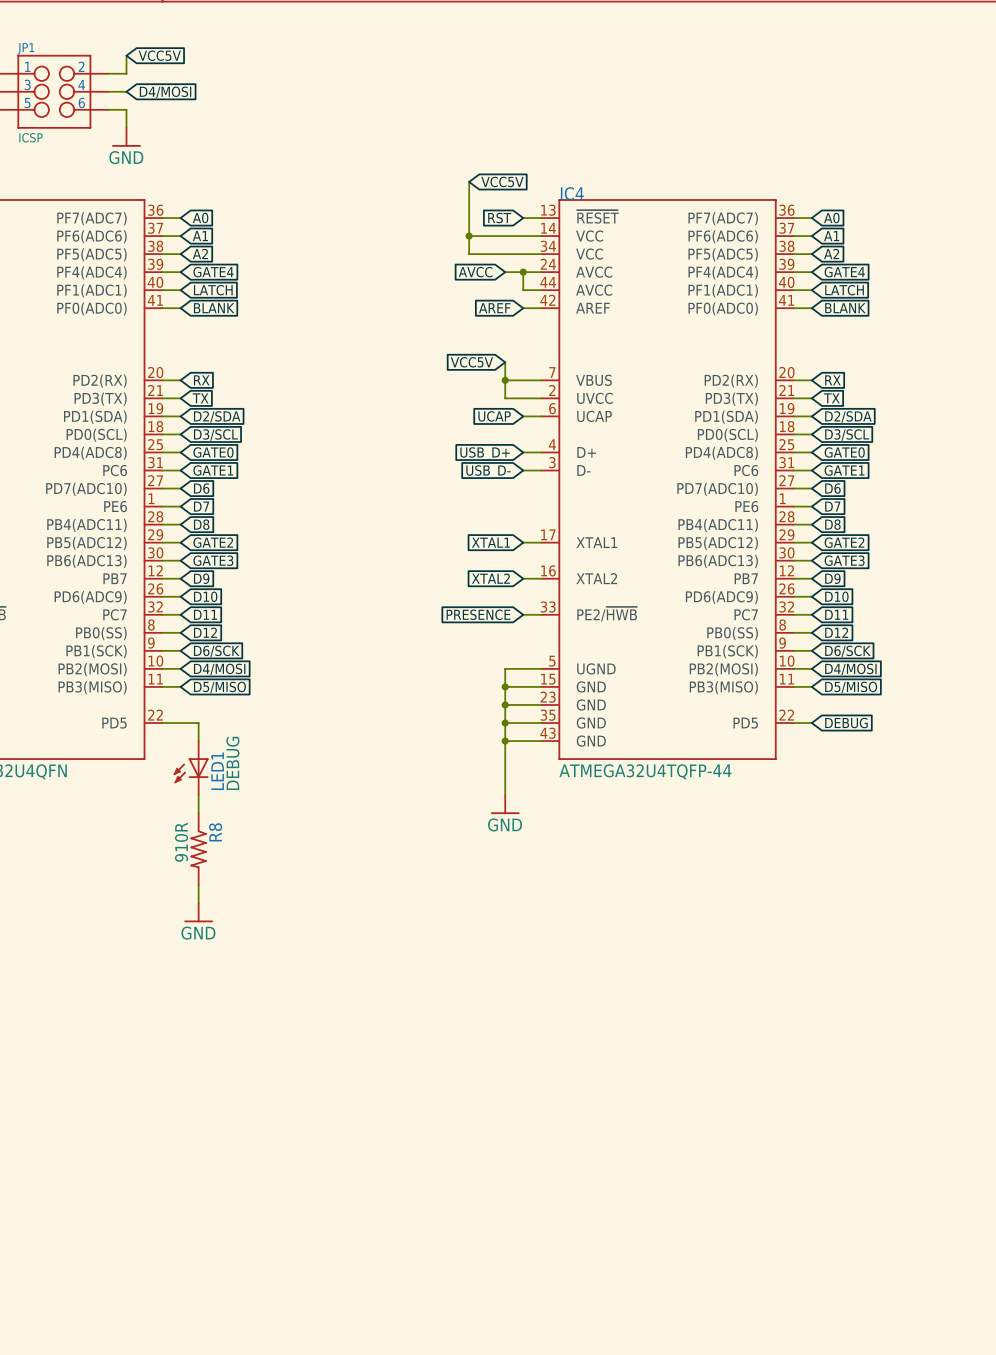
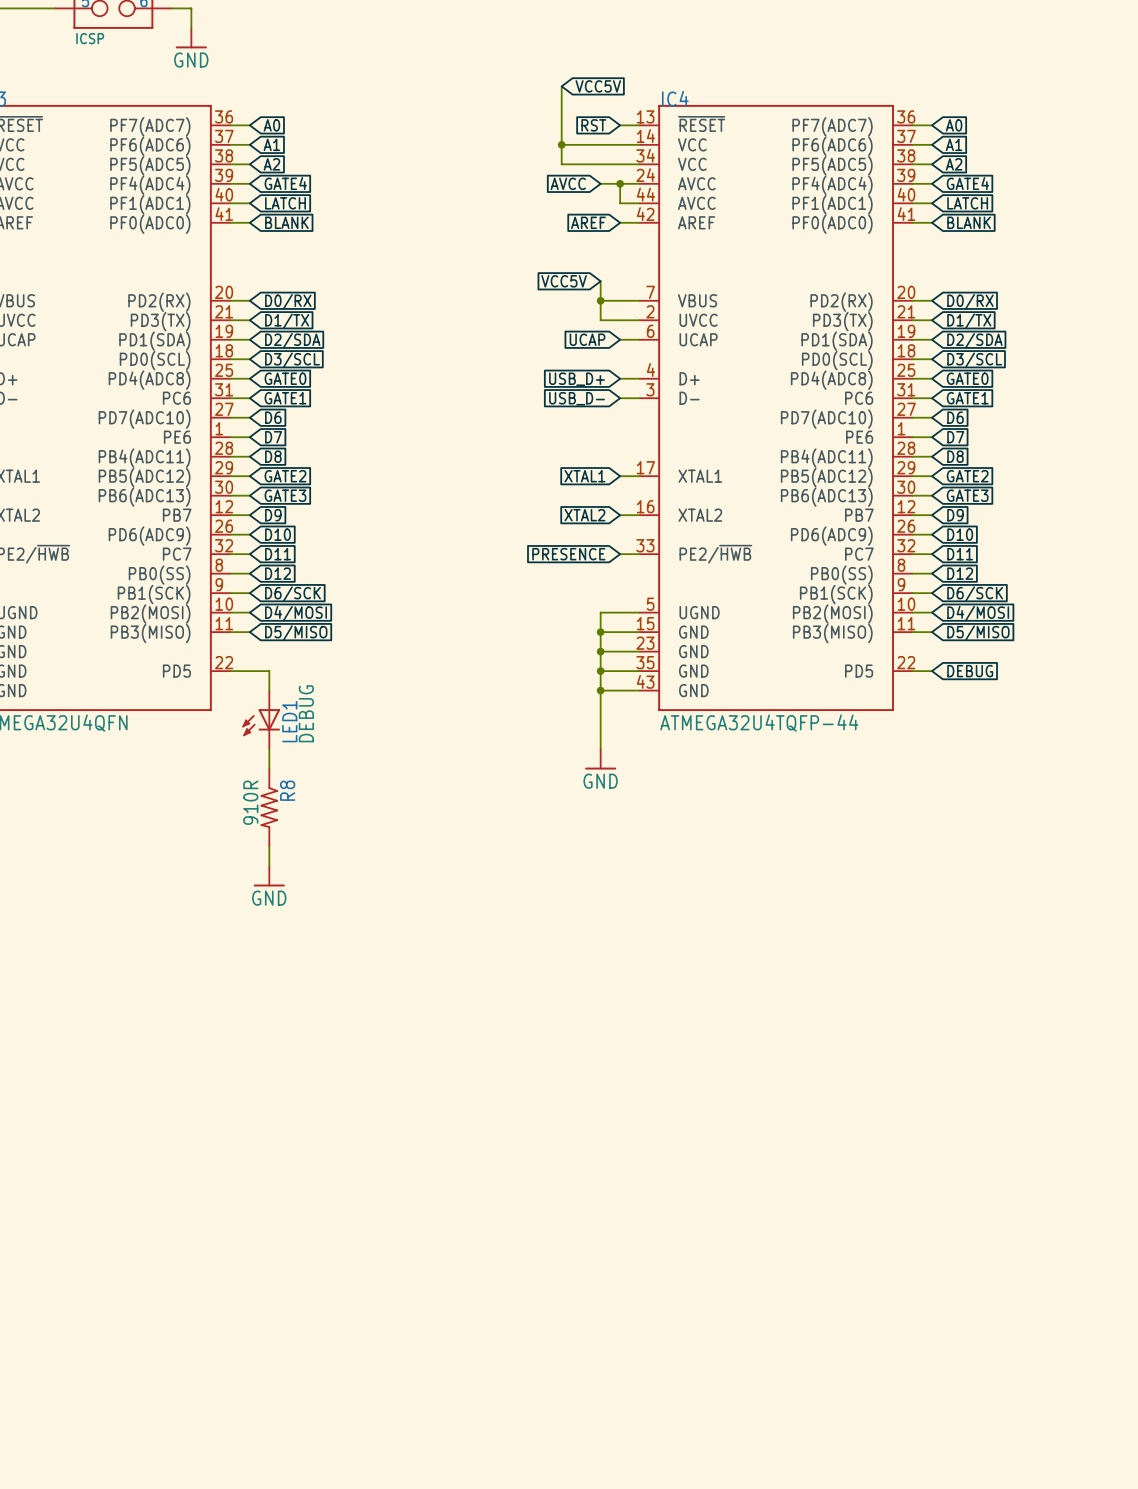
global label: RX (201, 380) -> D0/RX (288, 301)
global label: RX (832, 380) -> D0/RX (970, 301)
global label: TX (200, 398) -> D1/TX (287, 321)
global label: TX (831, 398) -> D1/TX (969, 321)

